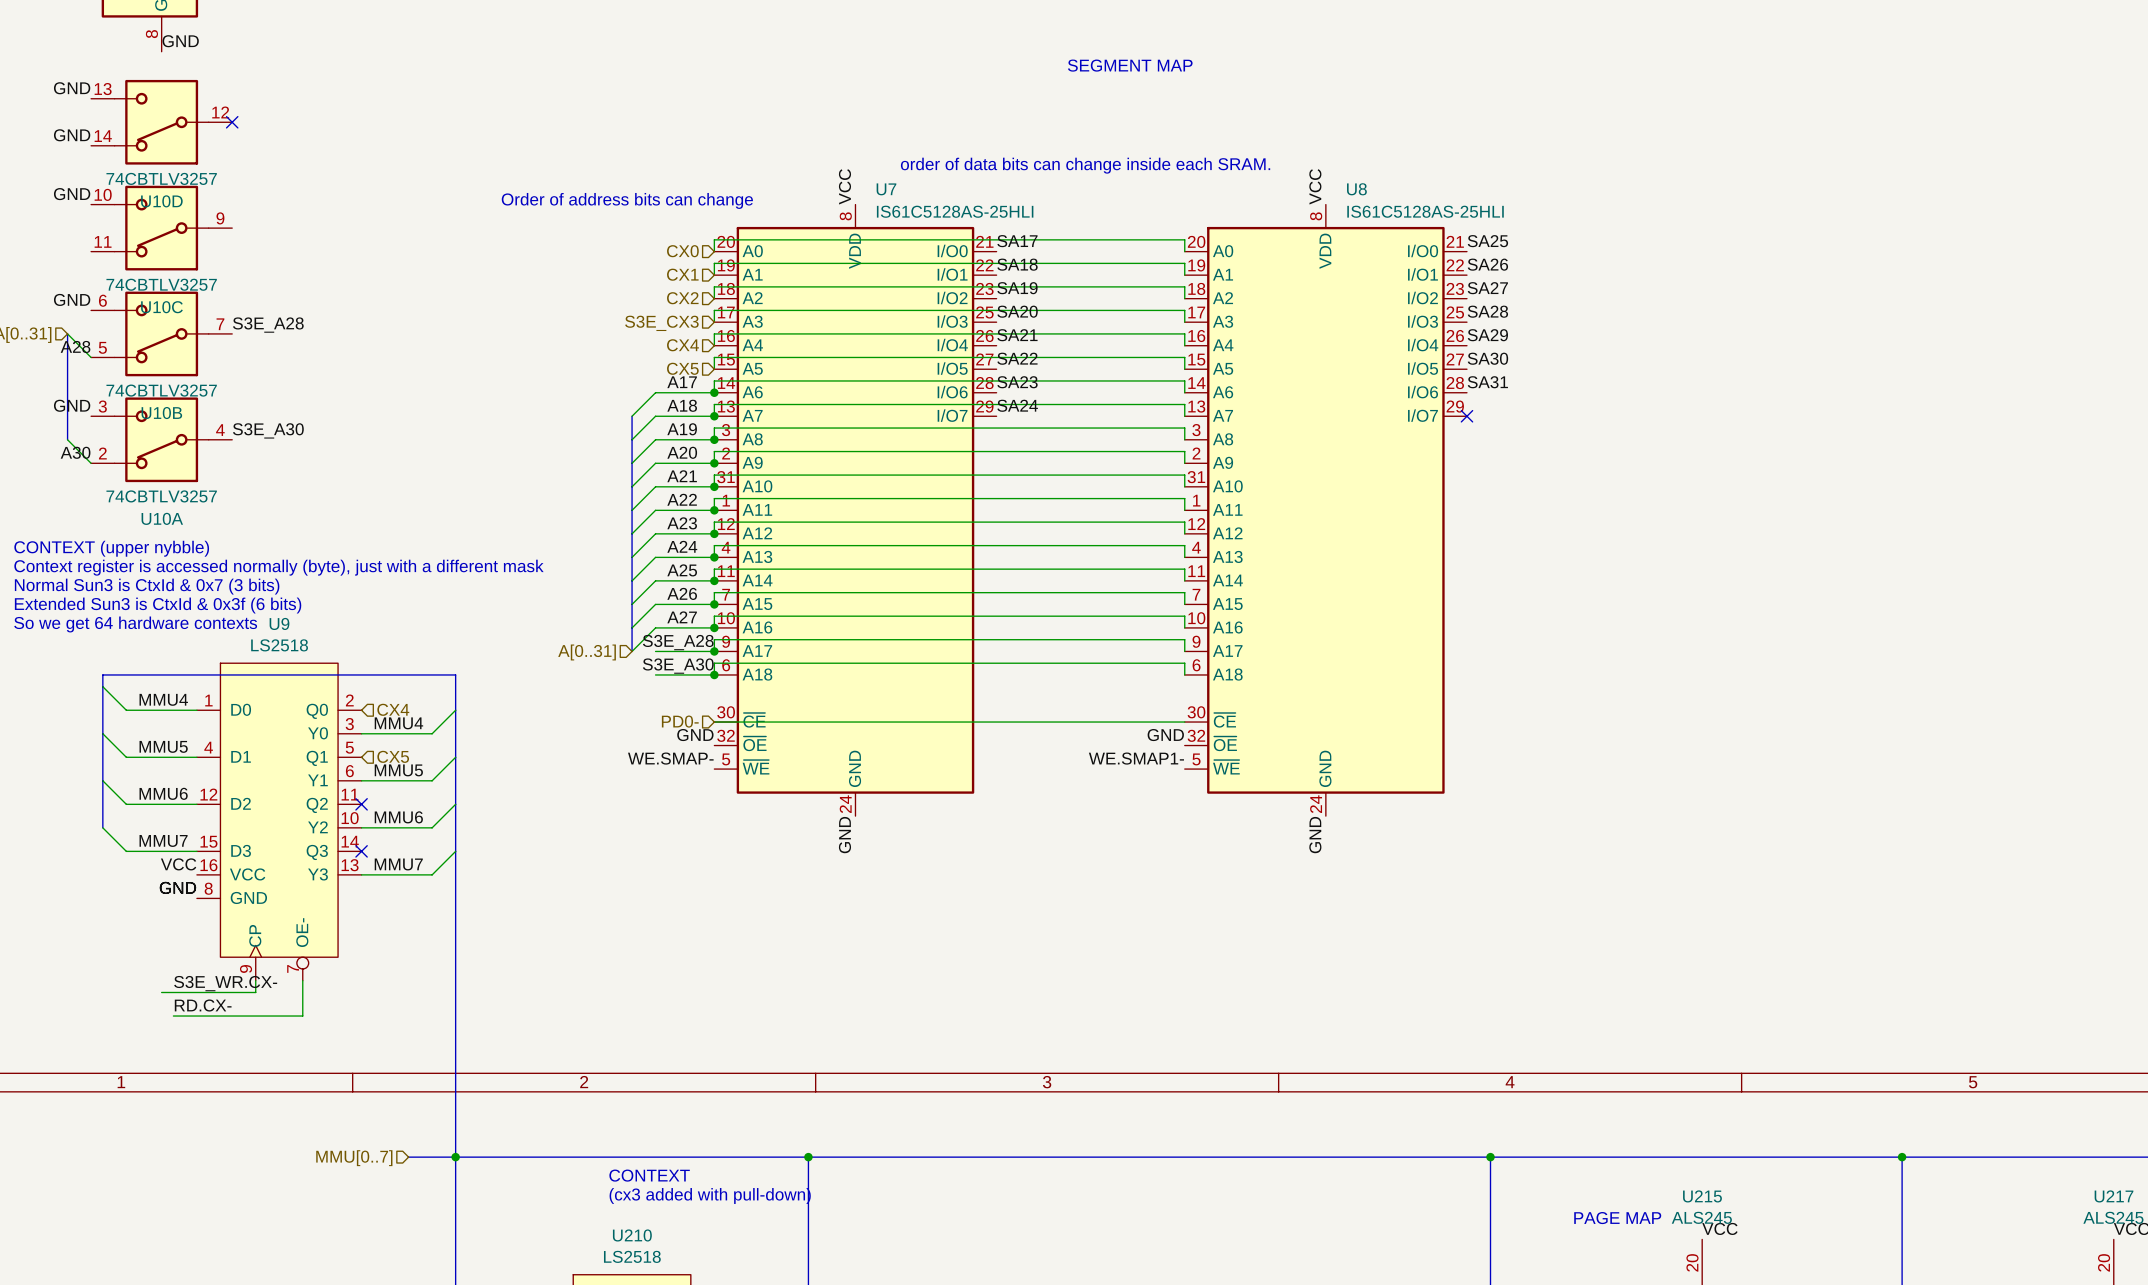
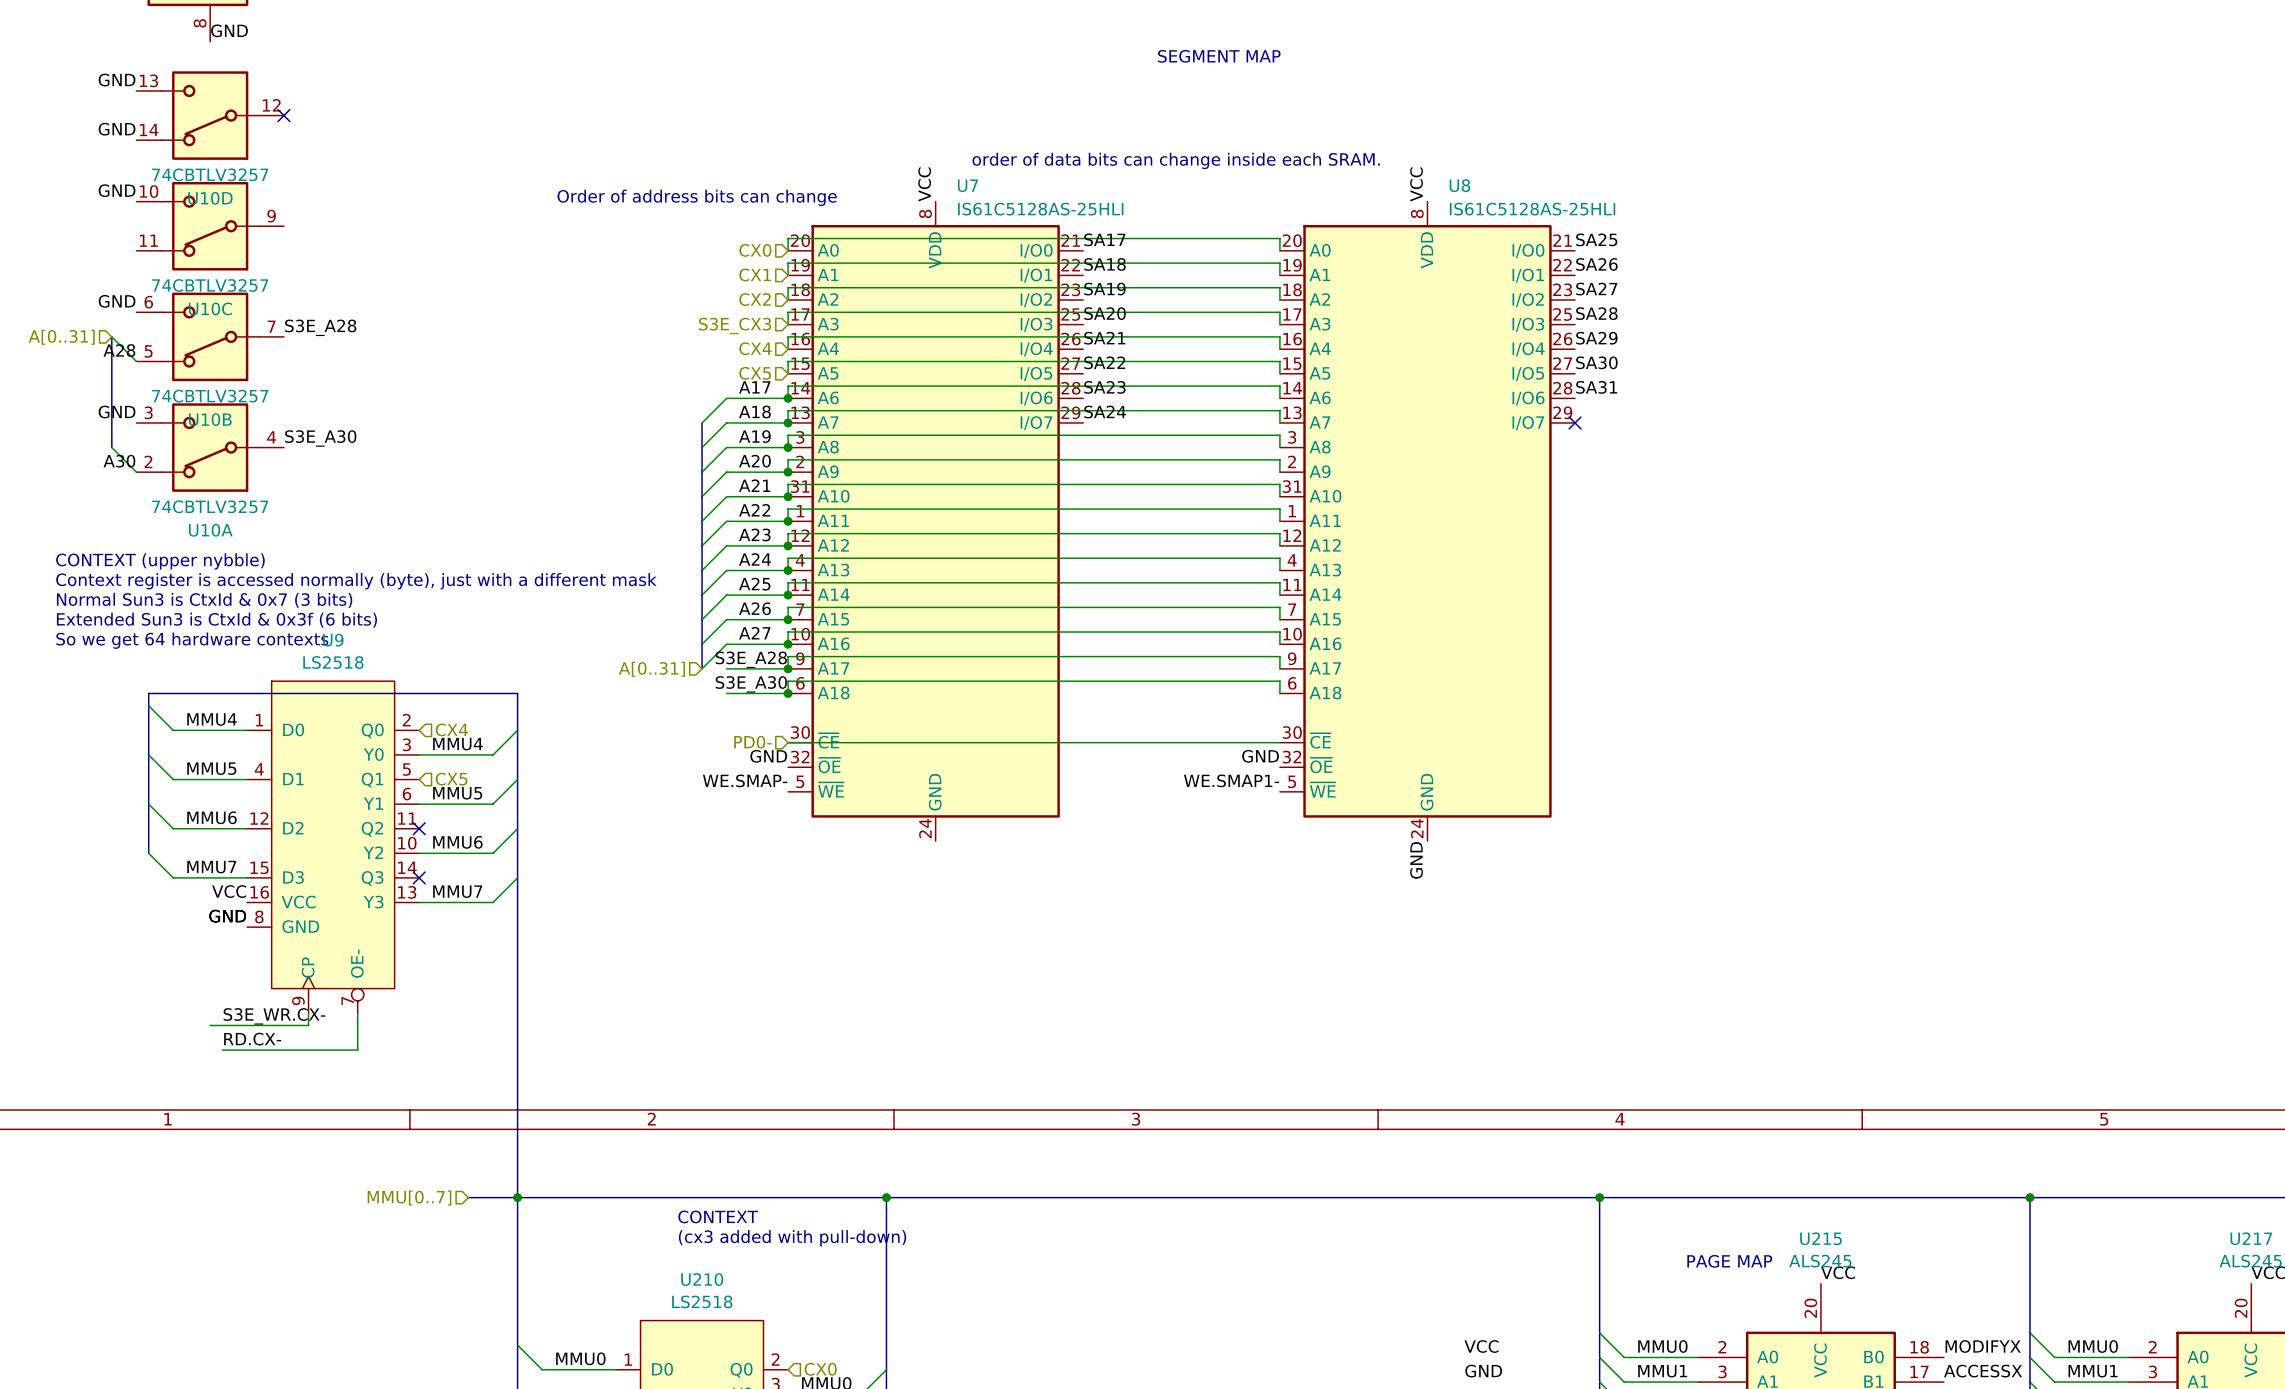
label: GND (844, 835) -> none

